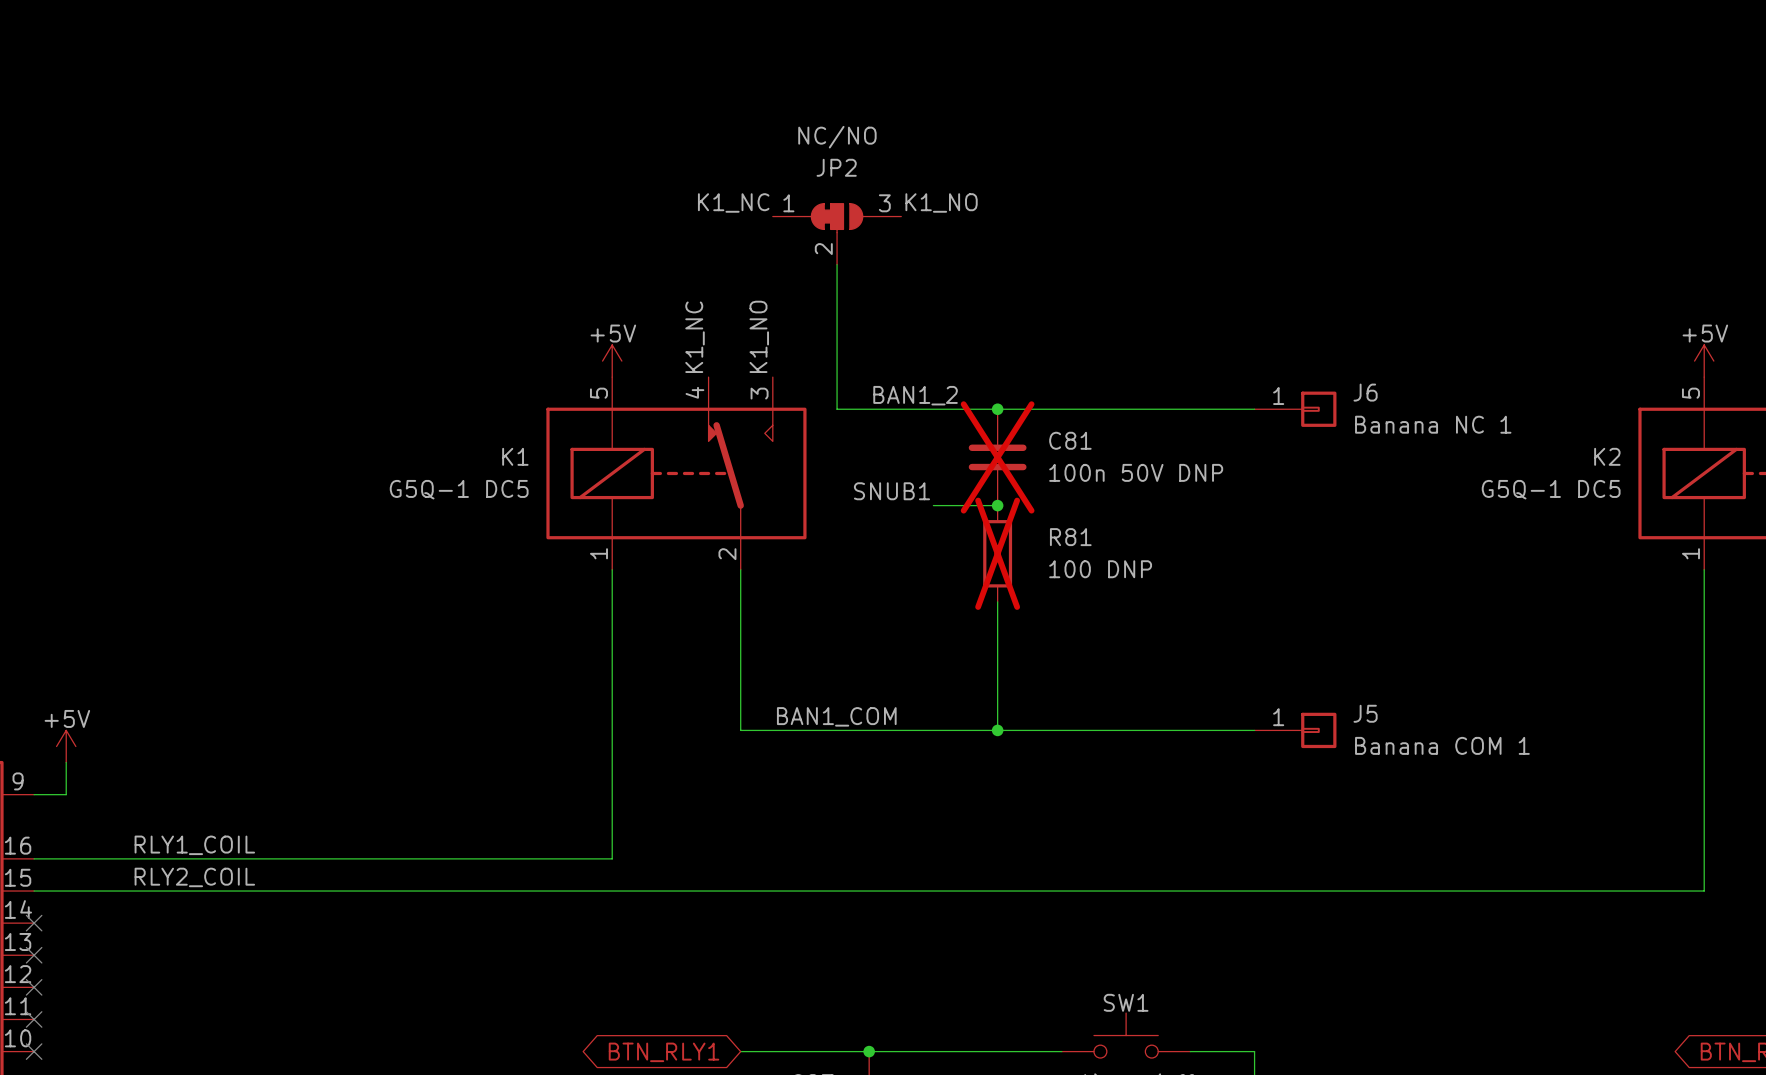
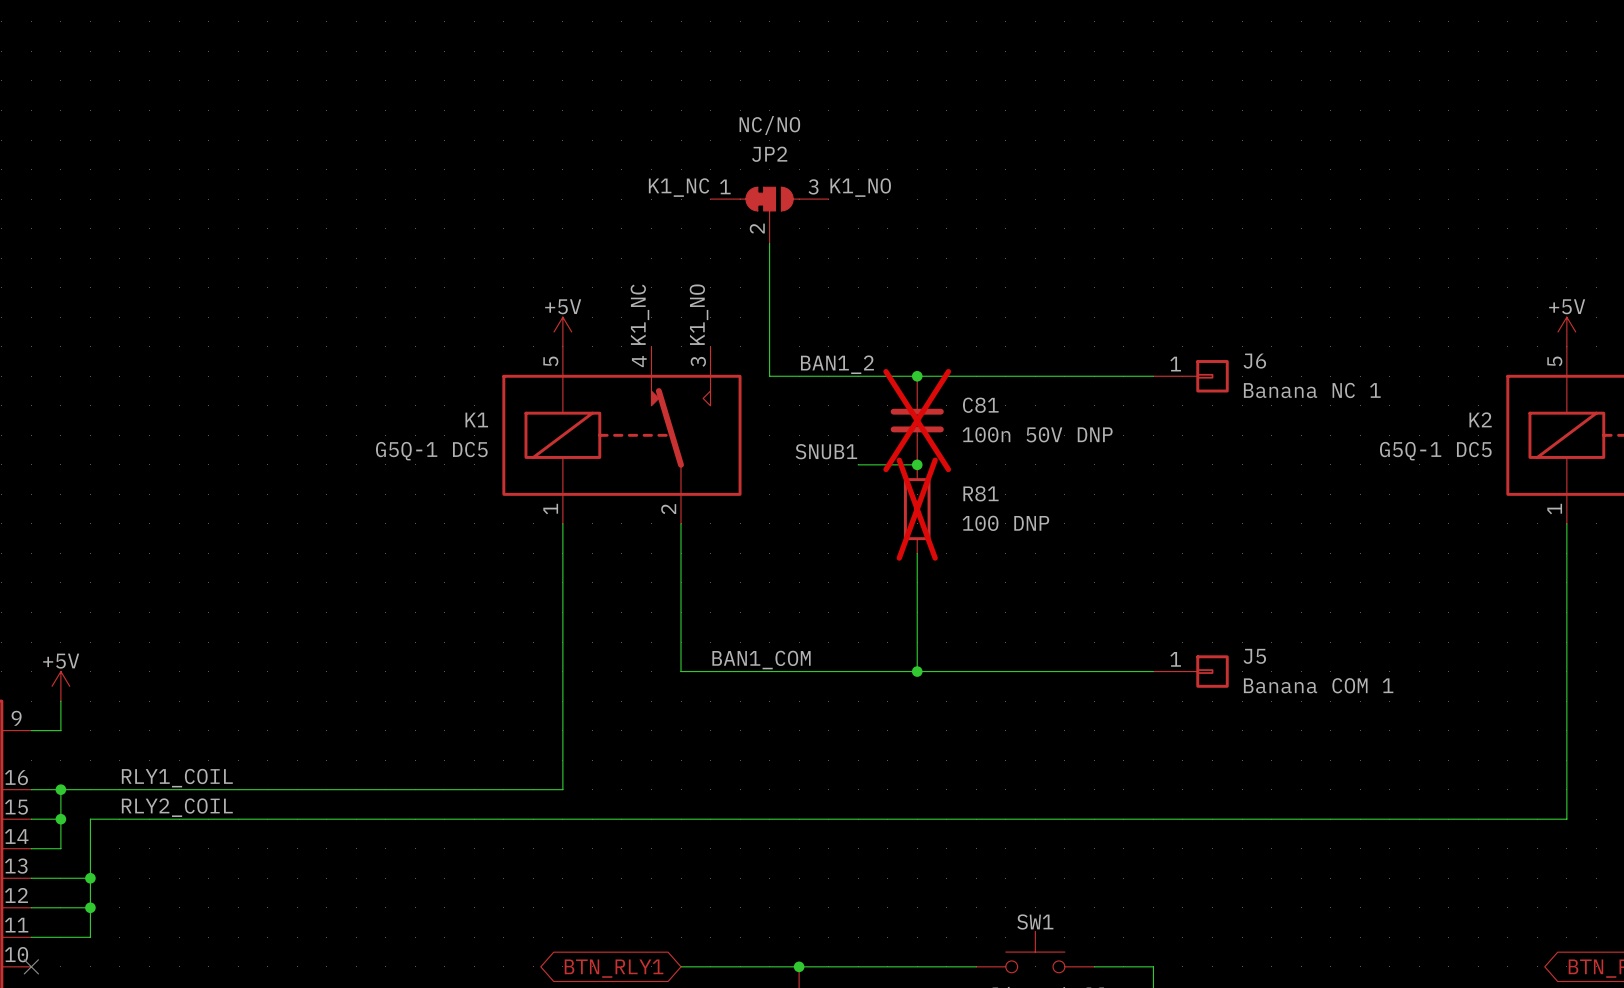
wire: none -> (60, 789) (60, 848) (31, 848)
junction: none -> (60, 789)
wire: (66, 891) (98, 891) -> (31, 937) (90, 937) (90, 819)
junction: none -> (60, 819)
no-connect mark: (34, 923) -> none
wire: none -> (31, 878) (90, 878)
no-connect mark: (34, 955) -> none
junction: none -> (90, 878)
wire: none -> (31, 907) (90, 907)
no-connect mark: (34, 987) -> none
junction: none -> (90, 907)
no-connect mark: (34, 1019) -> none

